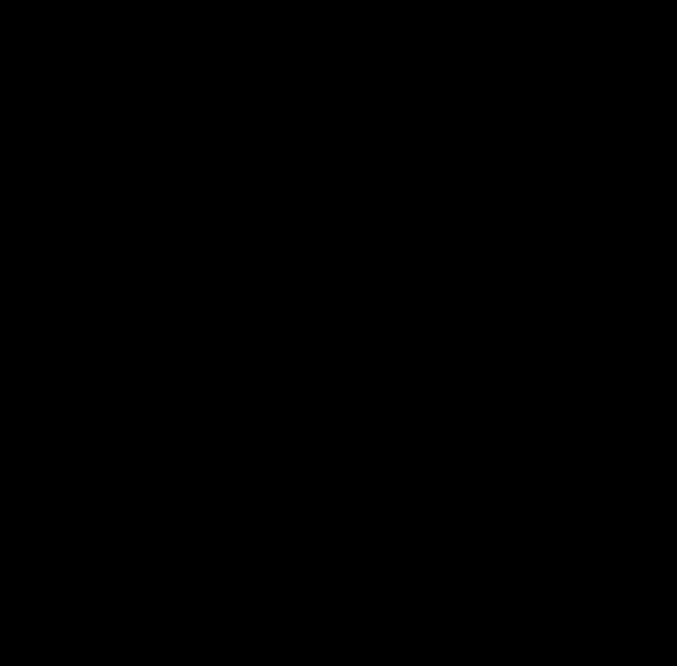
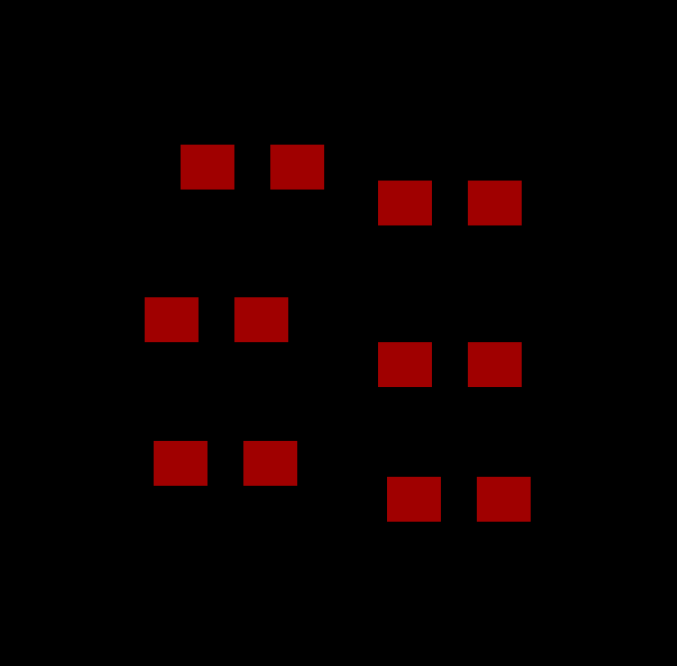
part: none -> (252, 167)
part: none -> (449, 203)
part: none -> (216, 319)
part: none -> (449, 364)
part: none -> (225, 463)
part: none -> (458, 499)

